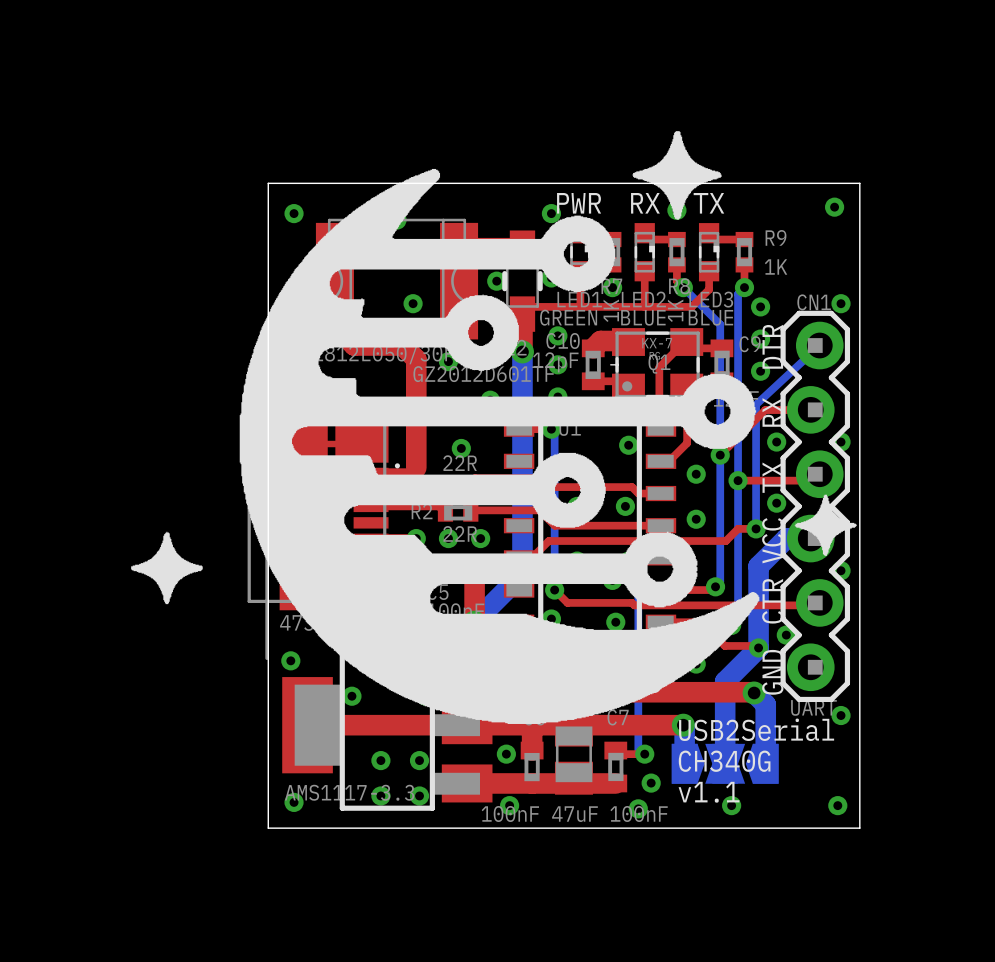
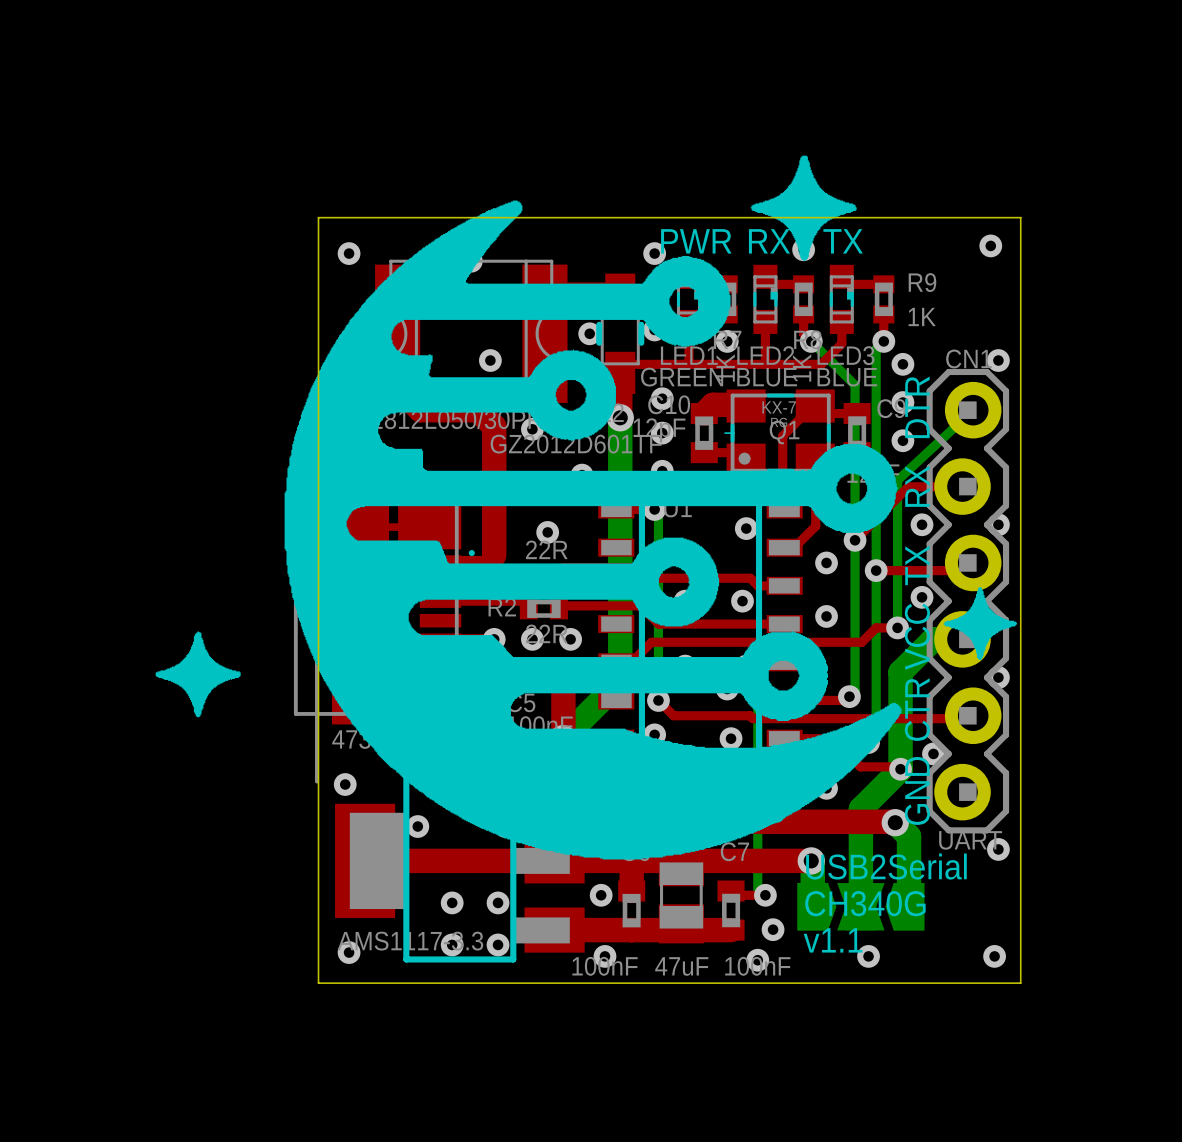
CN1 footprint: [780, 310, 851, 703] -> [926, 368, 1010, 834]

